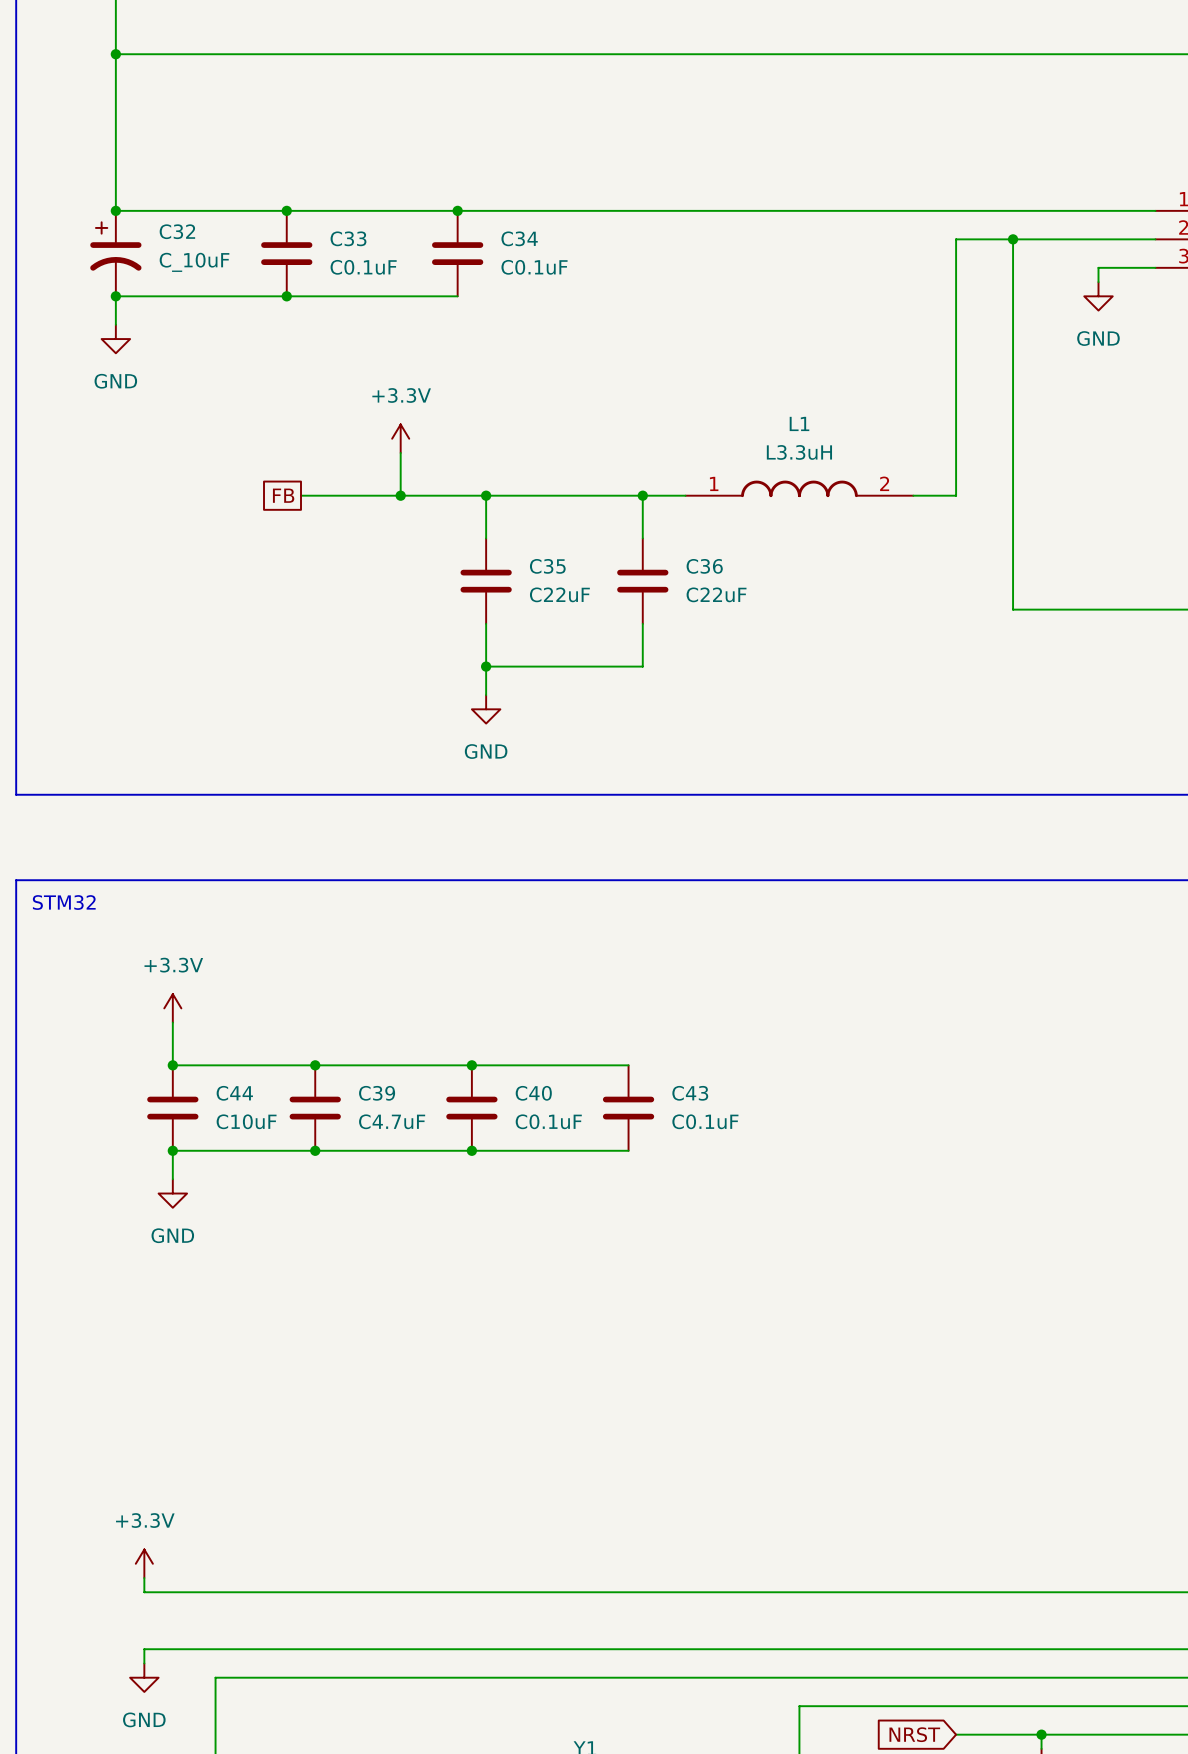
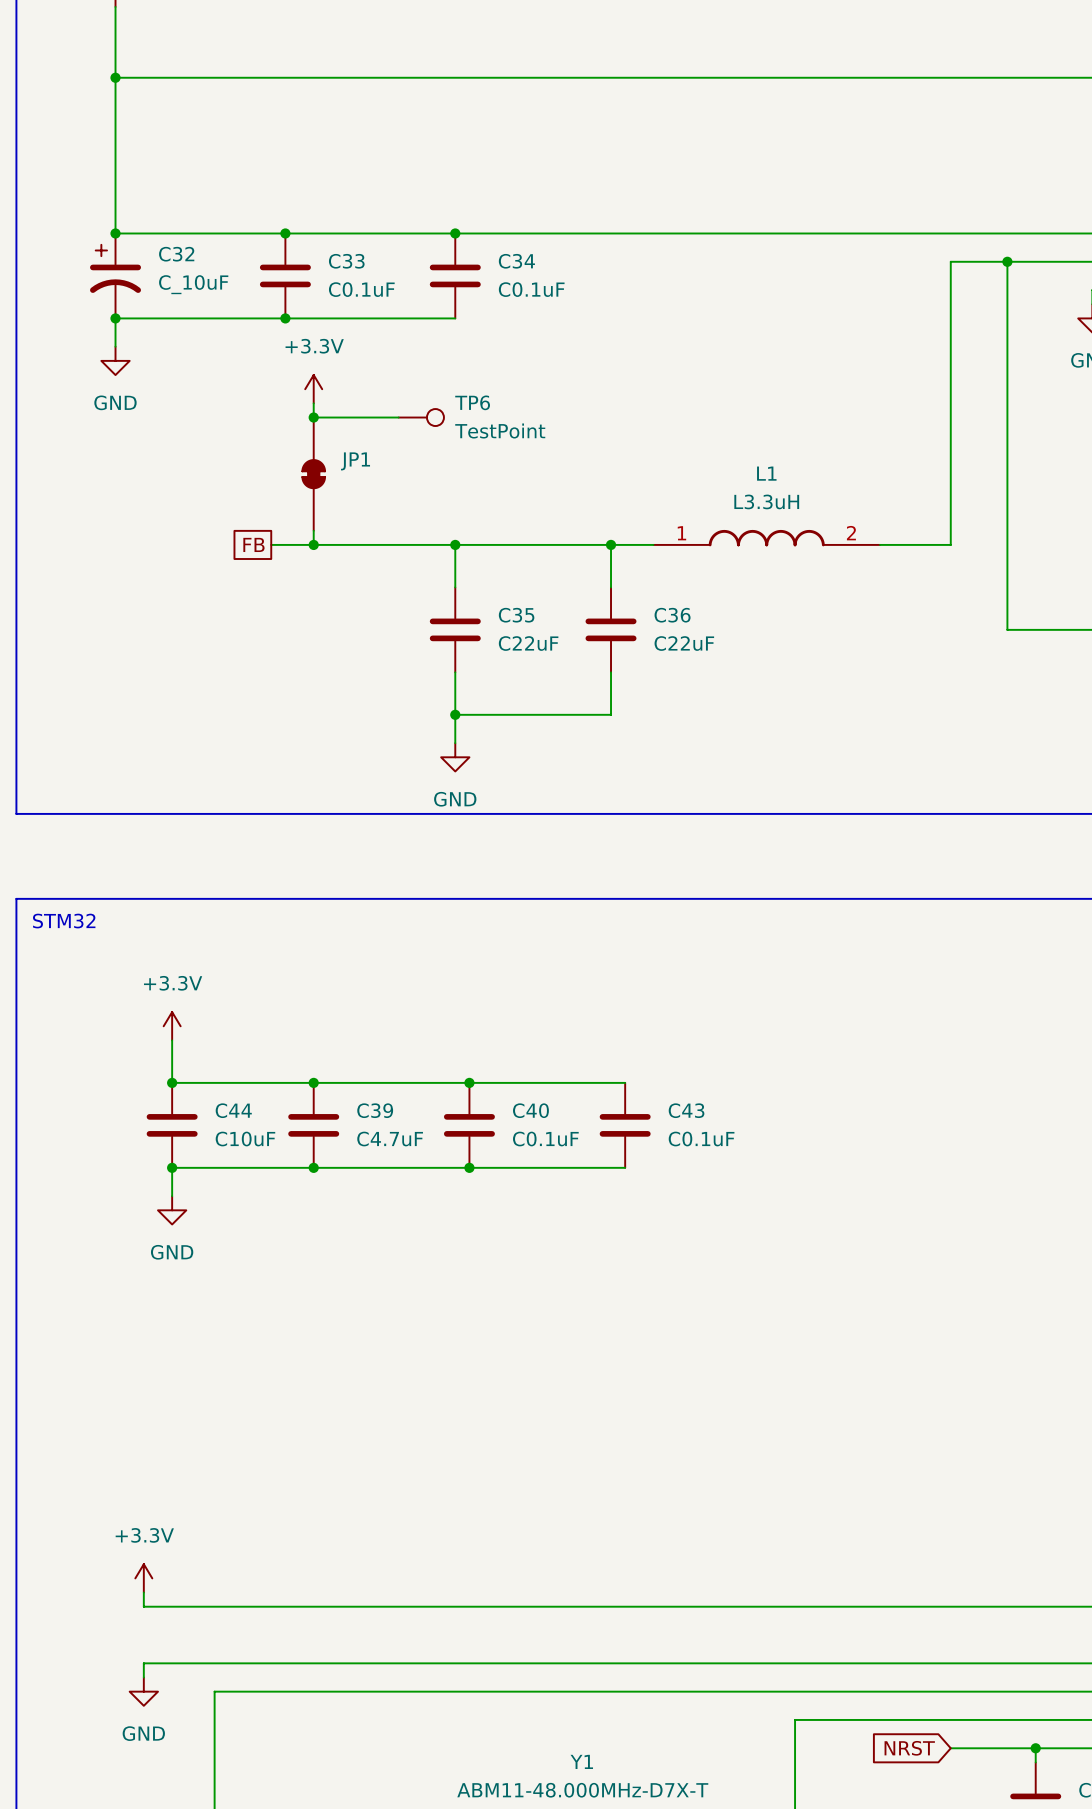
wire: none -> (313, 403) (313, 417) (398, 417)
junction: none -> (313, 417)
TP6: none -> TestPoint (421, 417)
power symbol position: +3.3V (400, 438) -> +3.3V (313, 389)
JP1: none -> (313, 474)
wire: (400, 452) (400, 495) -> none
L1 position: (799, 488) -> (766, 538)
global label position: FB (283, 495) -> FB (253, 544)
wire: (301, 495) (685, 495) -> (271, 544) (653, 544)
junction: (400, 495) -> none
wire: (486, 495) (486, 538) -> (455, 544) (455, 587)
junction: (486, 495) -> none
wire: (642, 495) (642, 538) -> (611, 544) (611, 587)
junction position: (642, 495) -> (611, 544)
wire: (913, 495) (956, 495) -> (879, 544) (950, 544) (950, 516)
wire: none -> (313, 530) (313, 544)
junction: none -> (313, 544)
junction: none -> (455, 544)
C35 position: (486, 581) -> (455, 629)
C36 position: (642, 581) -> (611, 629)
wire: (486, 623) (486, 695) -> (455, 672) (455, 743)
wire: (642, 623) (642, 666) (486, 666) -> (611, 672) (611, 714) (455, 714)
junction position: (486, 666) -> (455, 714)
power symbol position: GND (486, 709) -> GND (455, 757)

